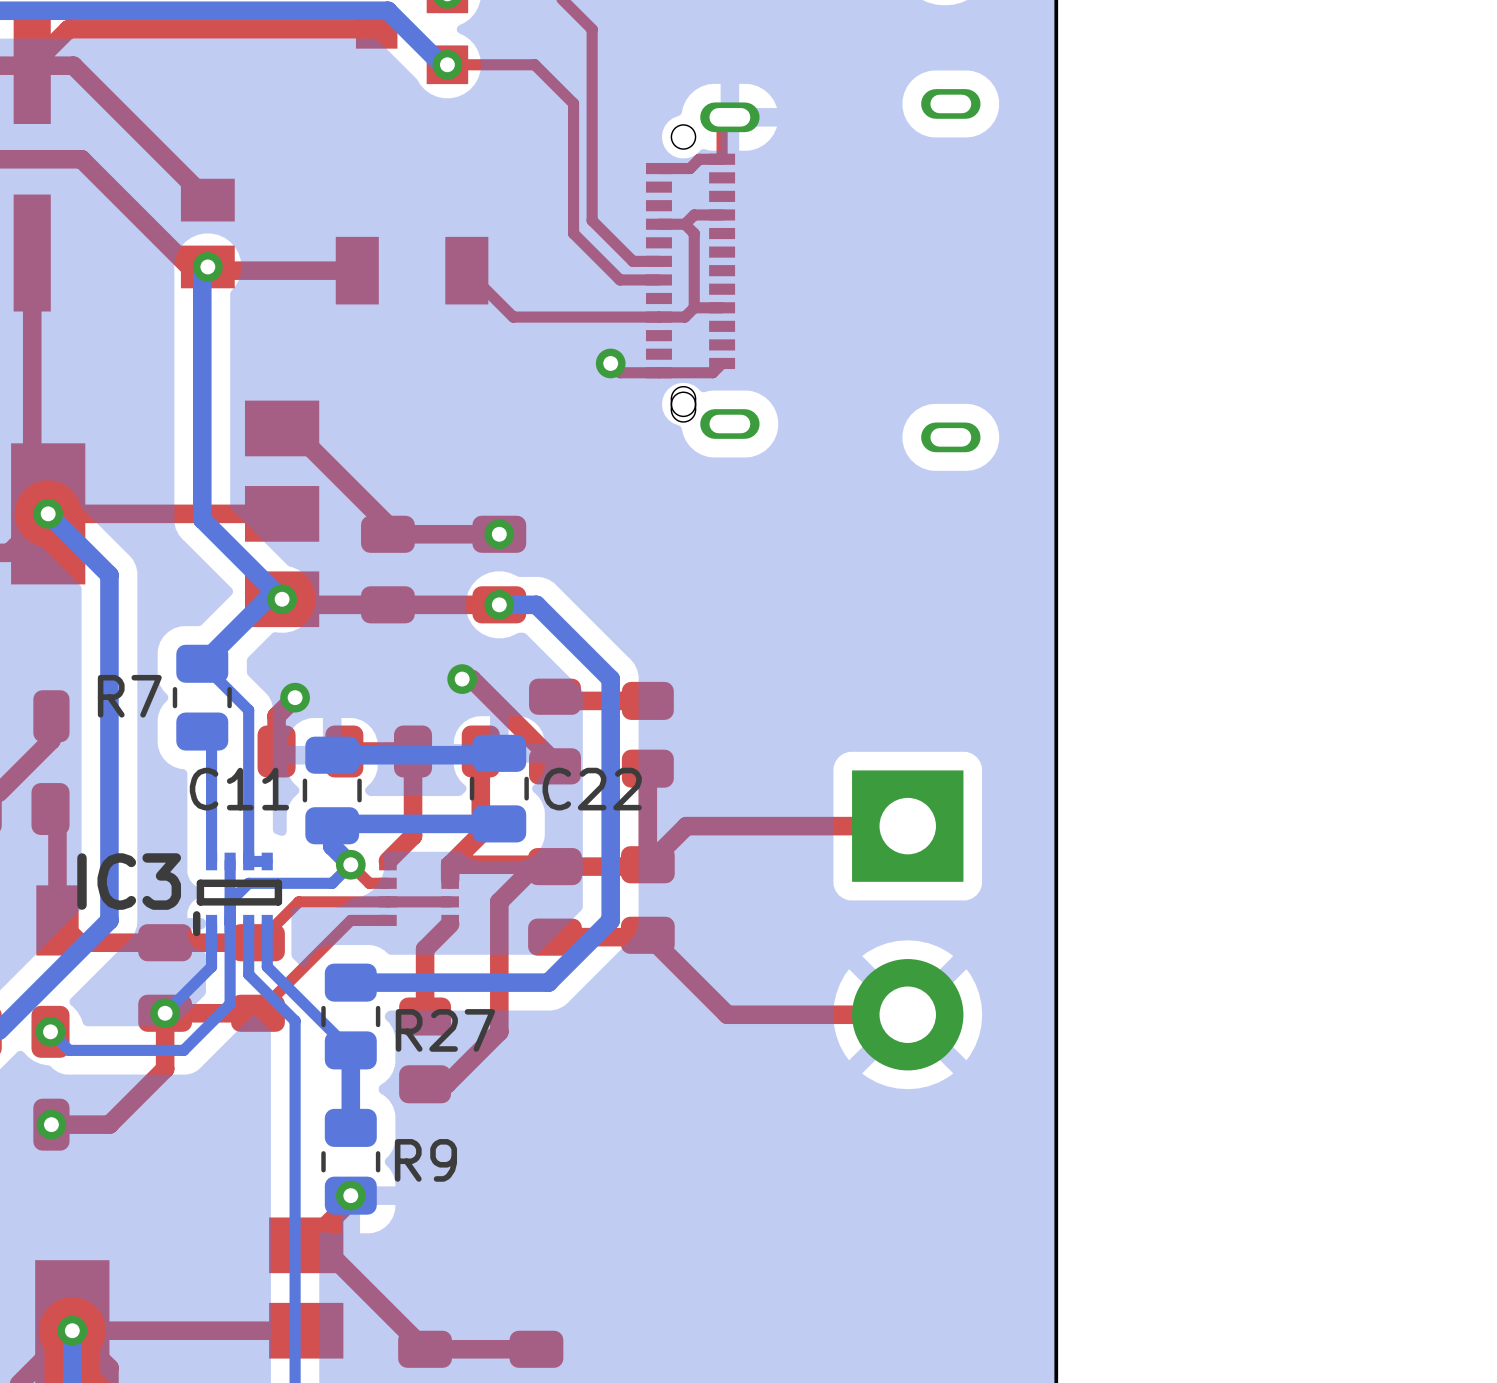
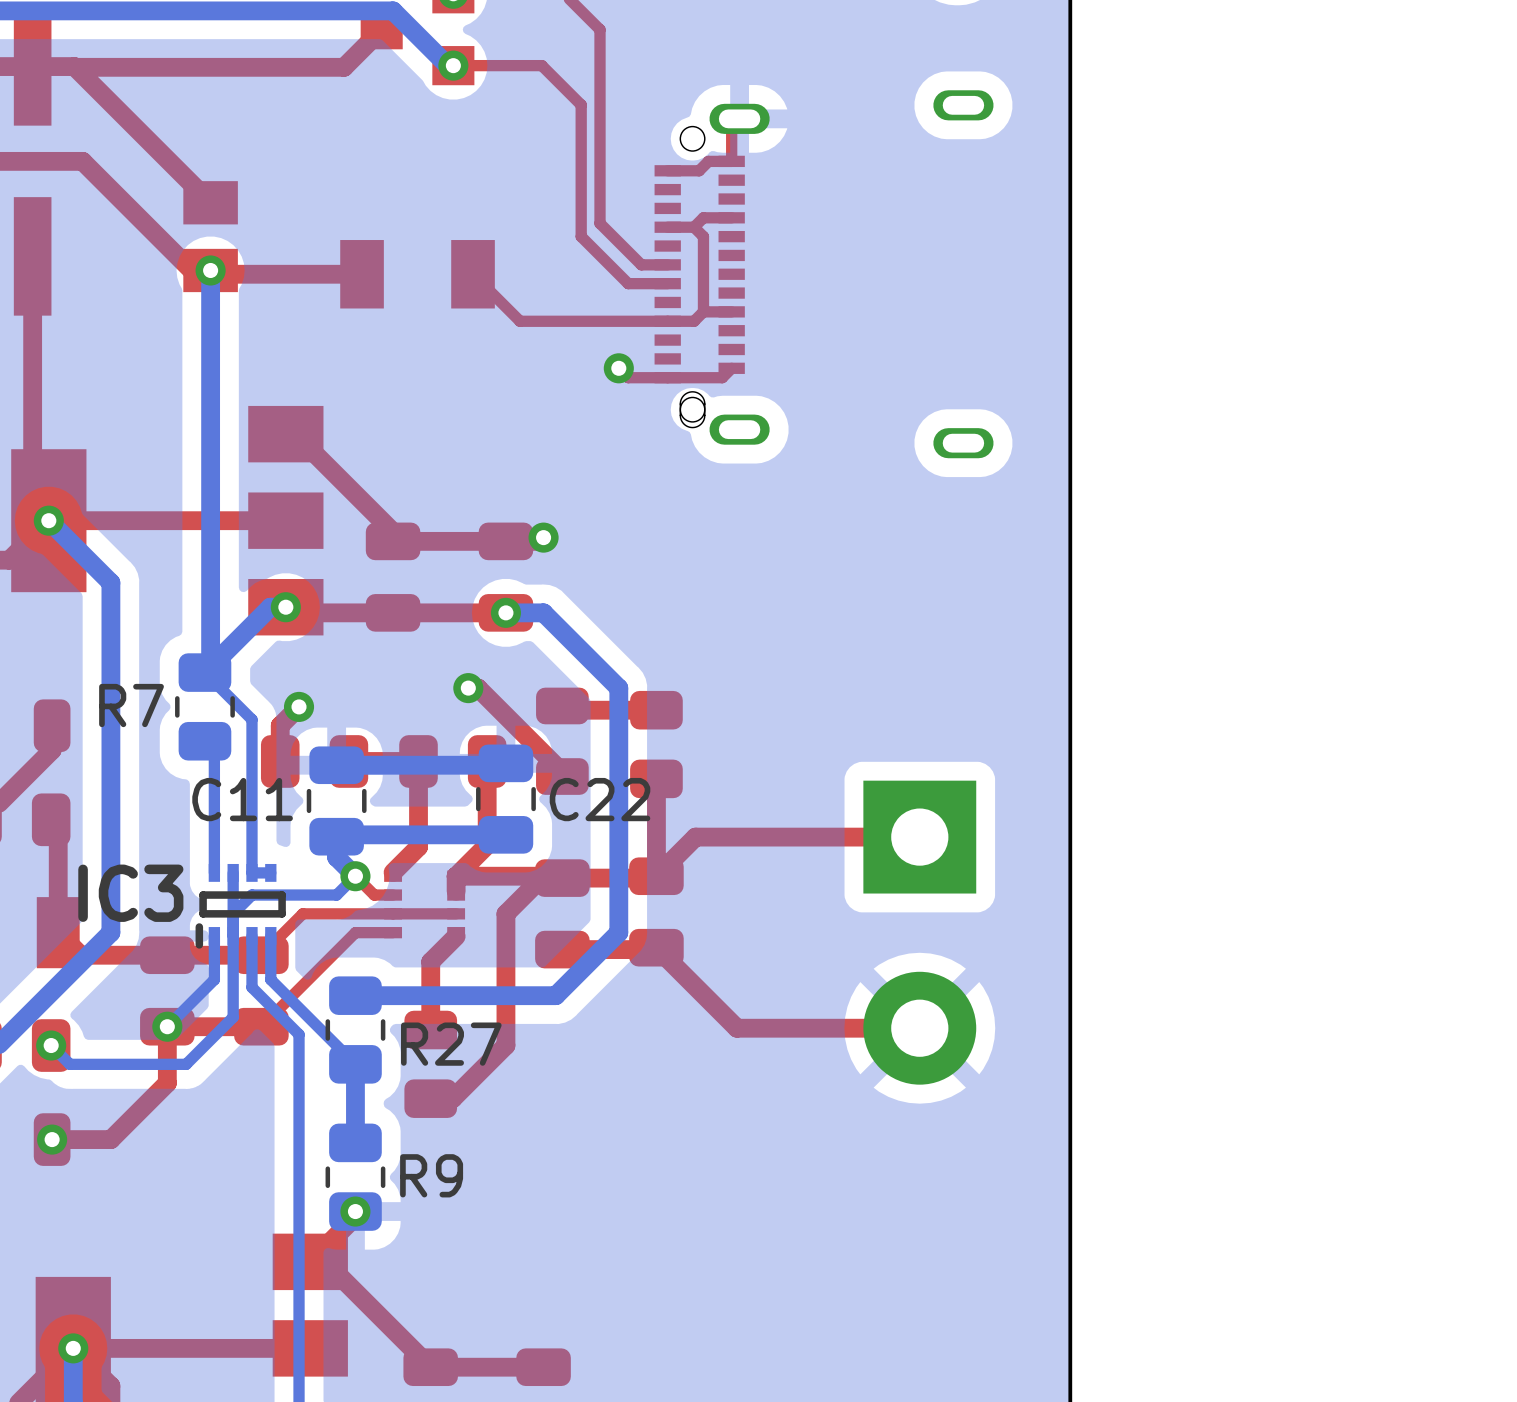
top track: (376, 29) (68, 29) (32, 65) -> (381, 29) (344, 67) (75, 67)
bottom track: (207, 266) (202, 272) (202, 519) (282, 599) -> (210, 270) (210, 666)
via position: (499, 534) -> (543, 537)

